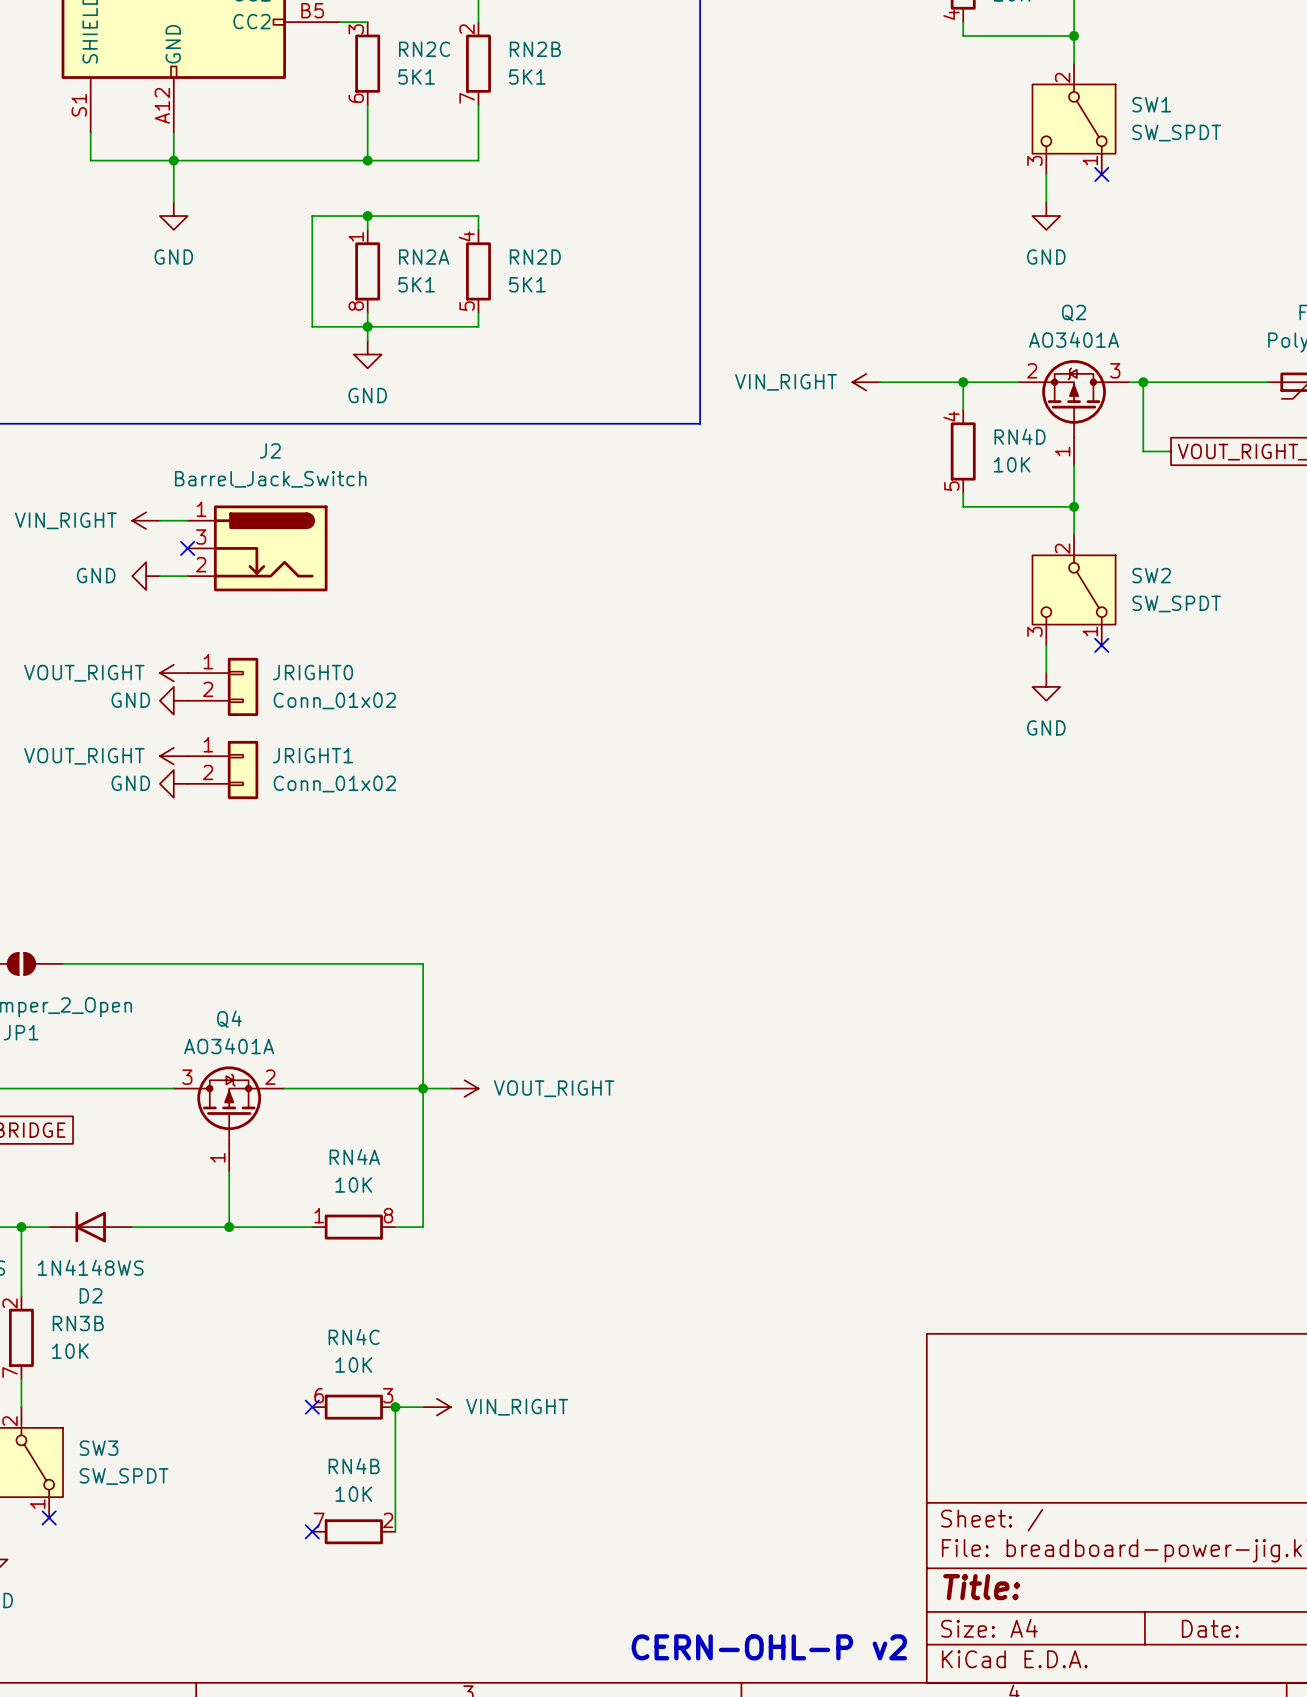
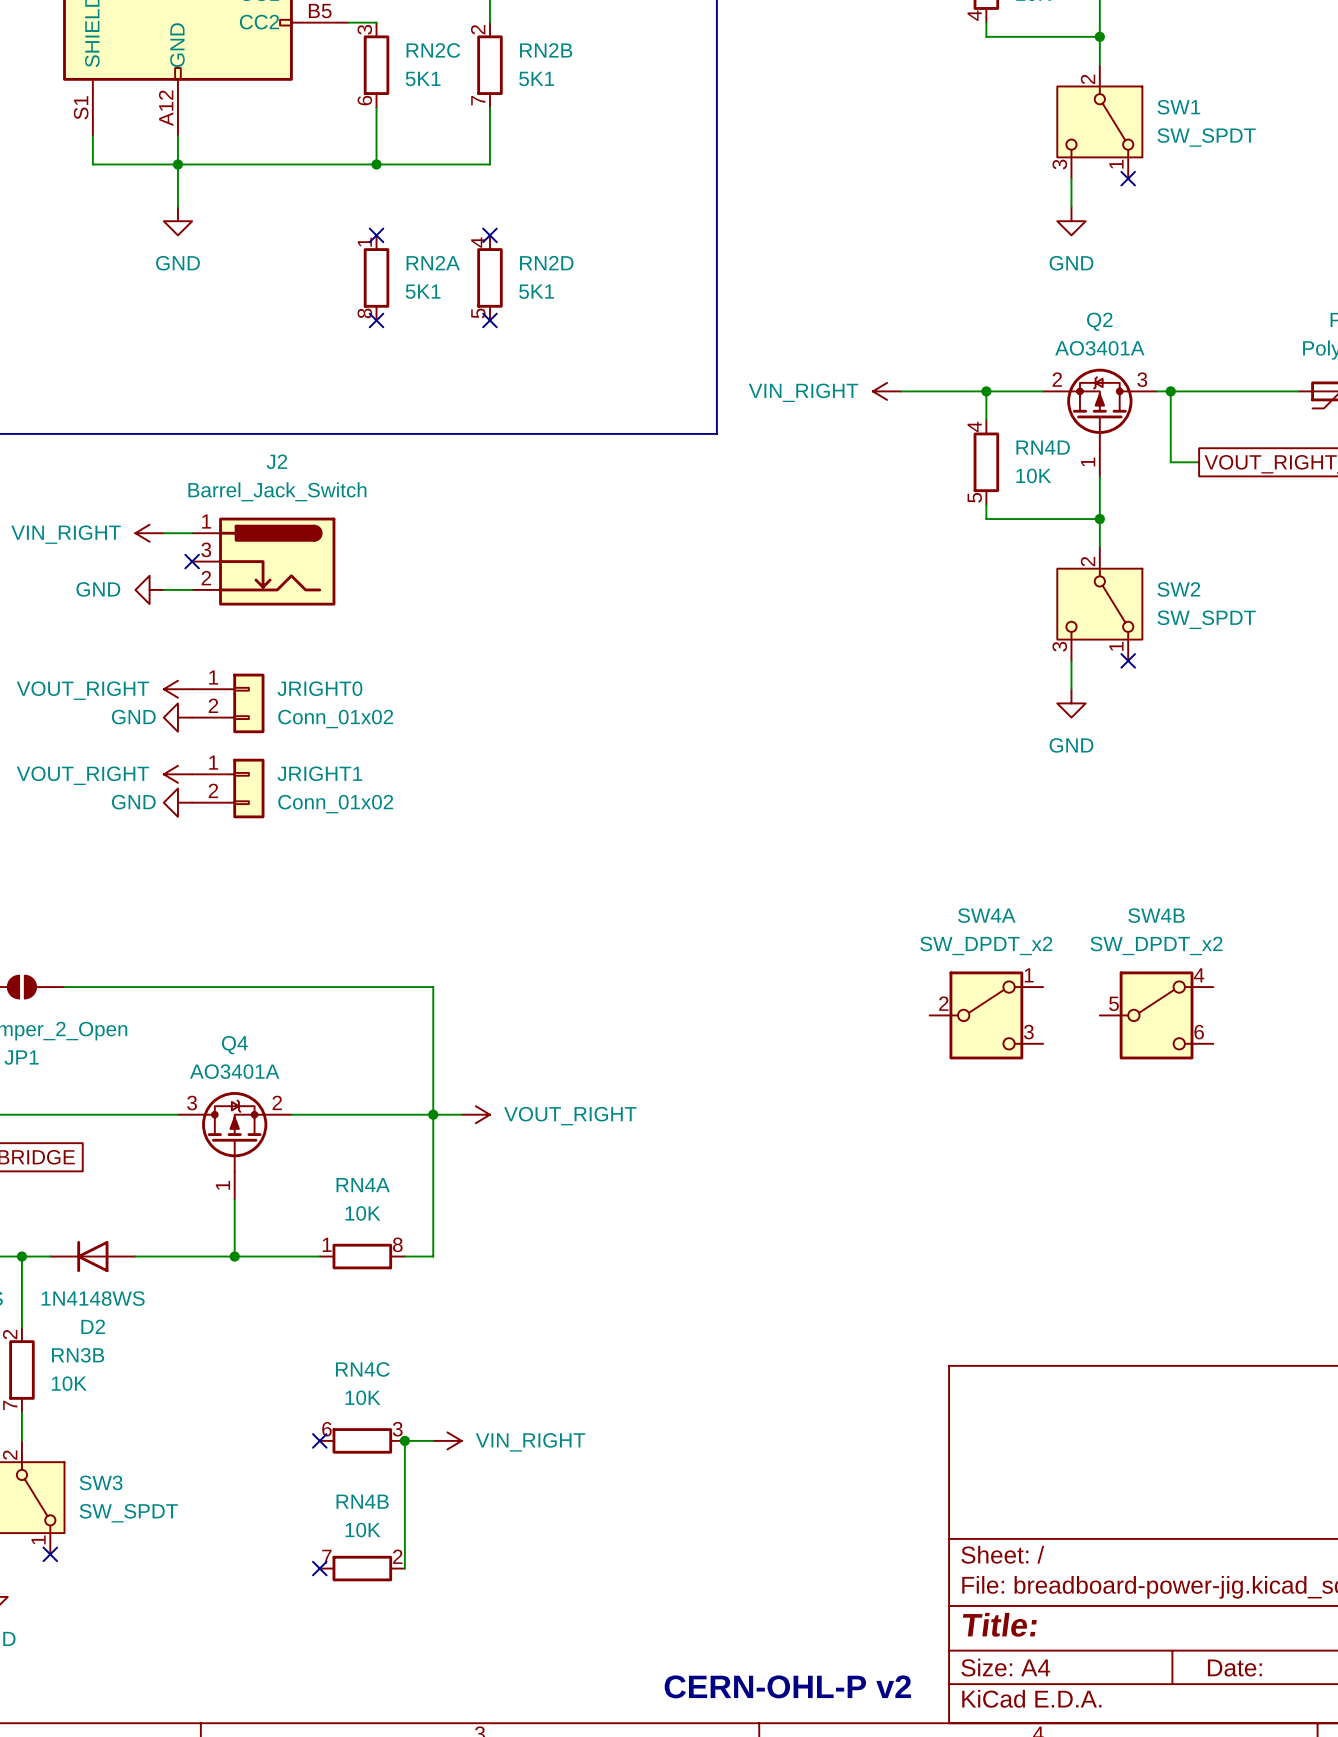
wire: (367, 216) (367, 229) -> none
junction: (367, 216) -> none
no-connect mark: none -> (376, 235)
wire: (478, 229) (478, 216) (312, 216) (312, 326) (478, 326) (478, 312) -> none
no-connect mark: none -> (489, 235)
wire: (367, 312) (367, 340) -> none
no-connect mark: none -> (376, 320)
no-connect mark: none -> (489, 320)
junction: (367, 326) -> none
power symbol: GND (367, 354) -> none
SW4A: none -> SW_DPDT_x2 (986, 1015)
SW4B: none -> SW_DPDT_x2 (1156, 1015)

